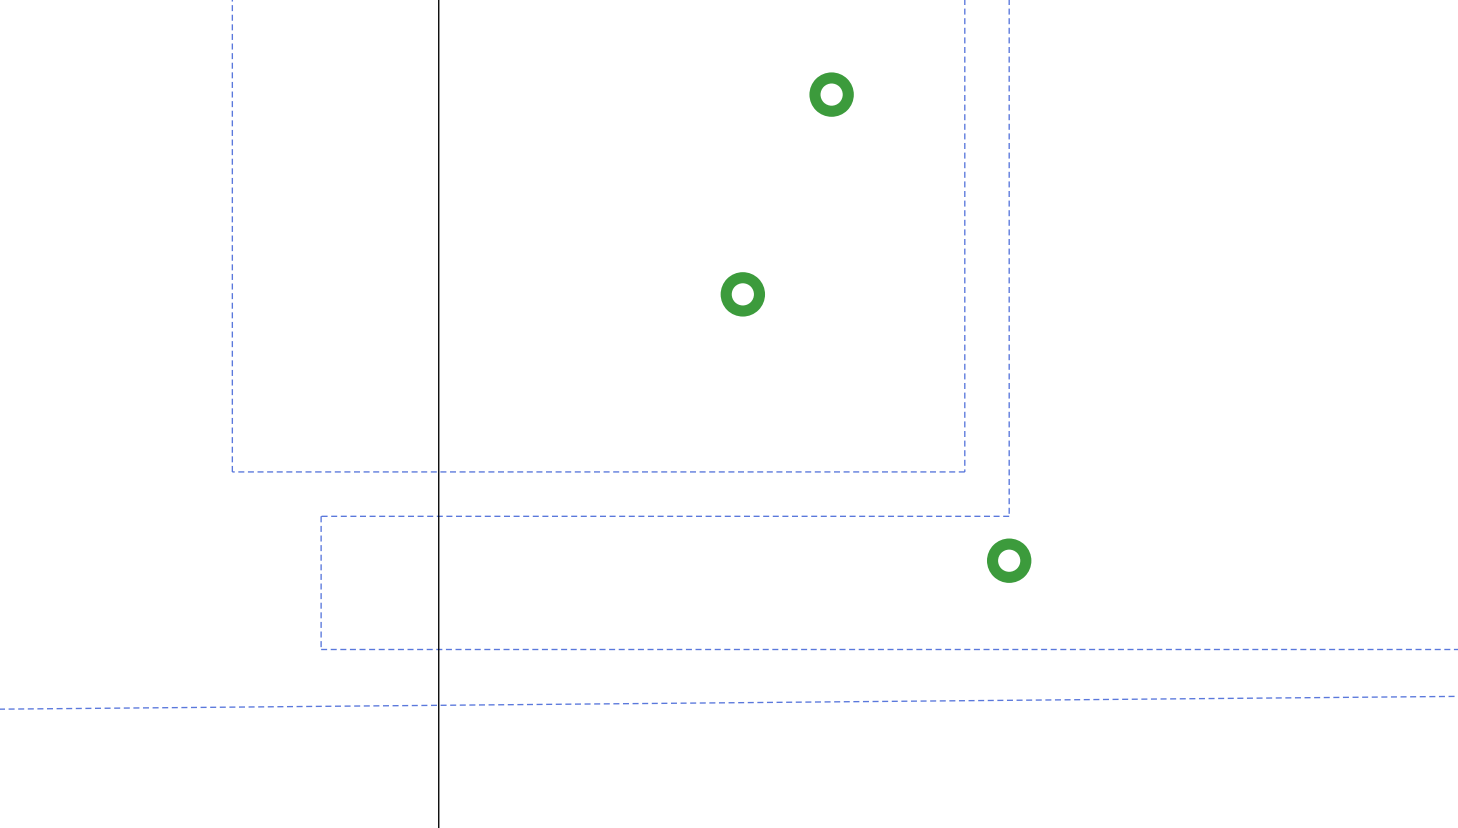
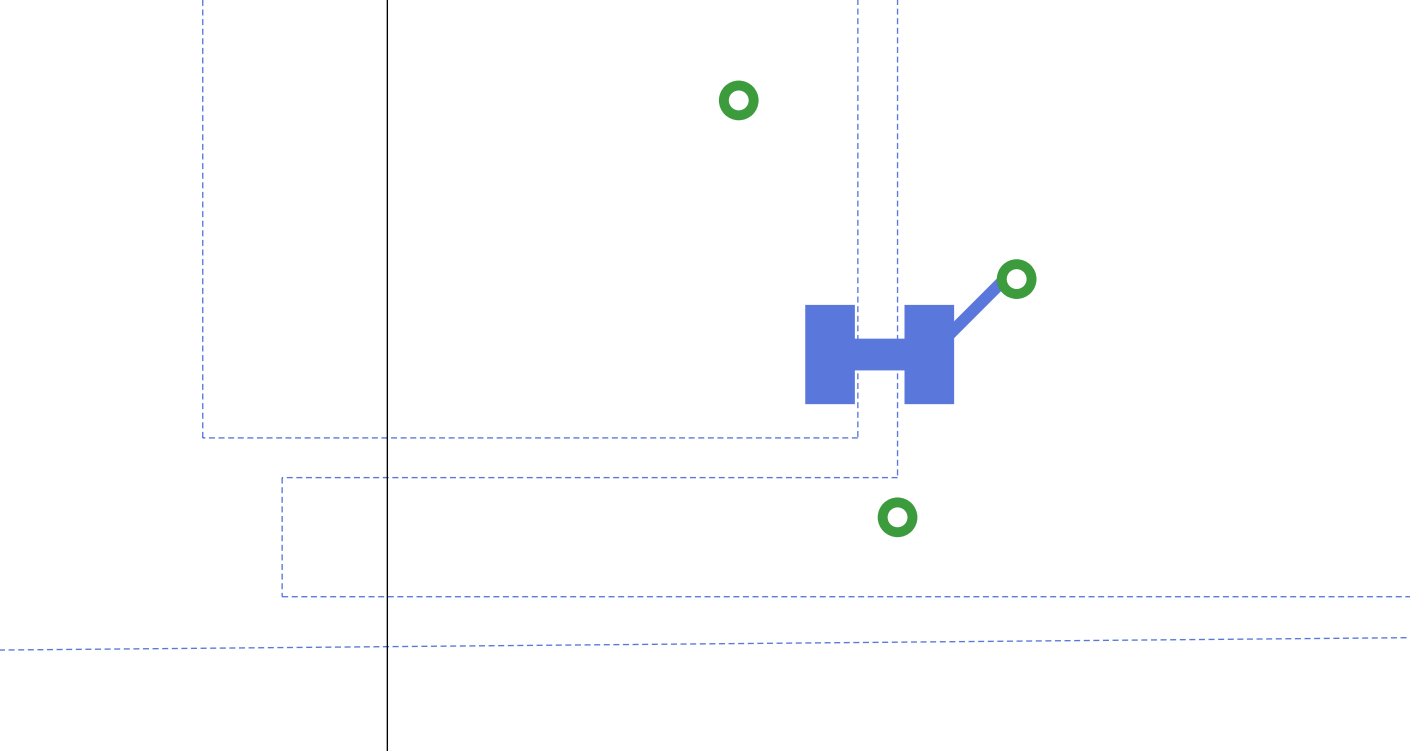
via: (742, 294) -> none
track: none -> (1016, 279) (1004, 279) (929, 354)
via: none -> (1016, 279)
part: none -> (879, 354)

